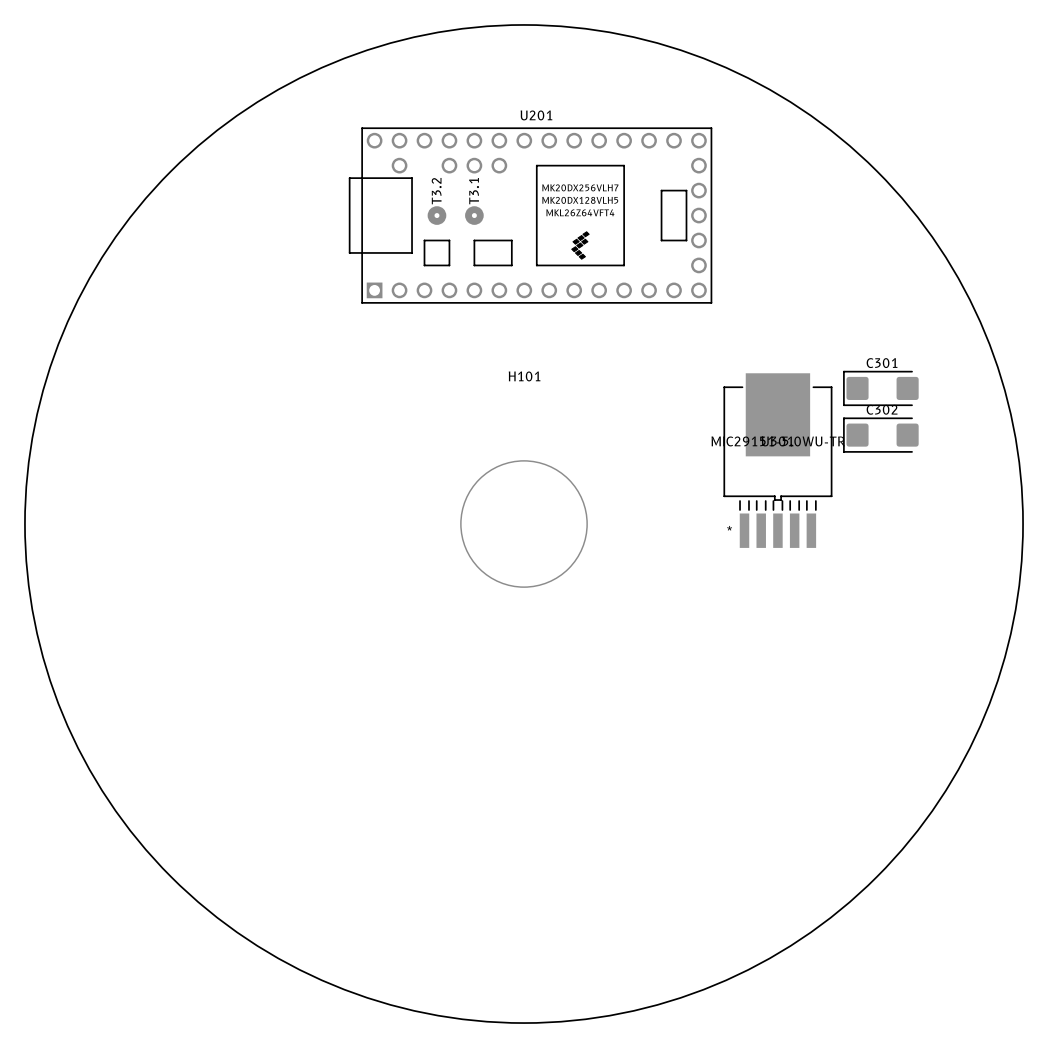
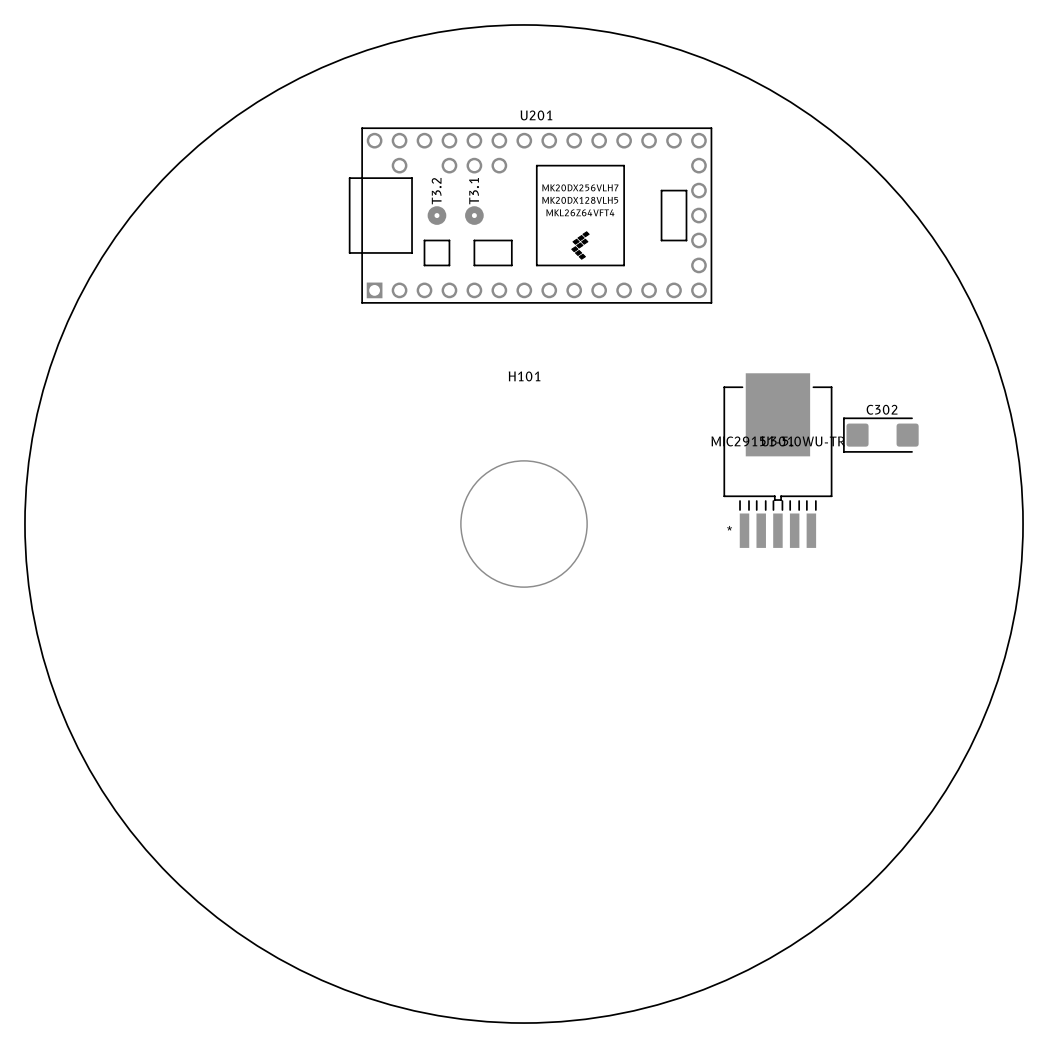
C301: (880, 388) -> none

